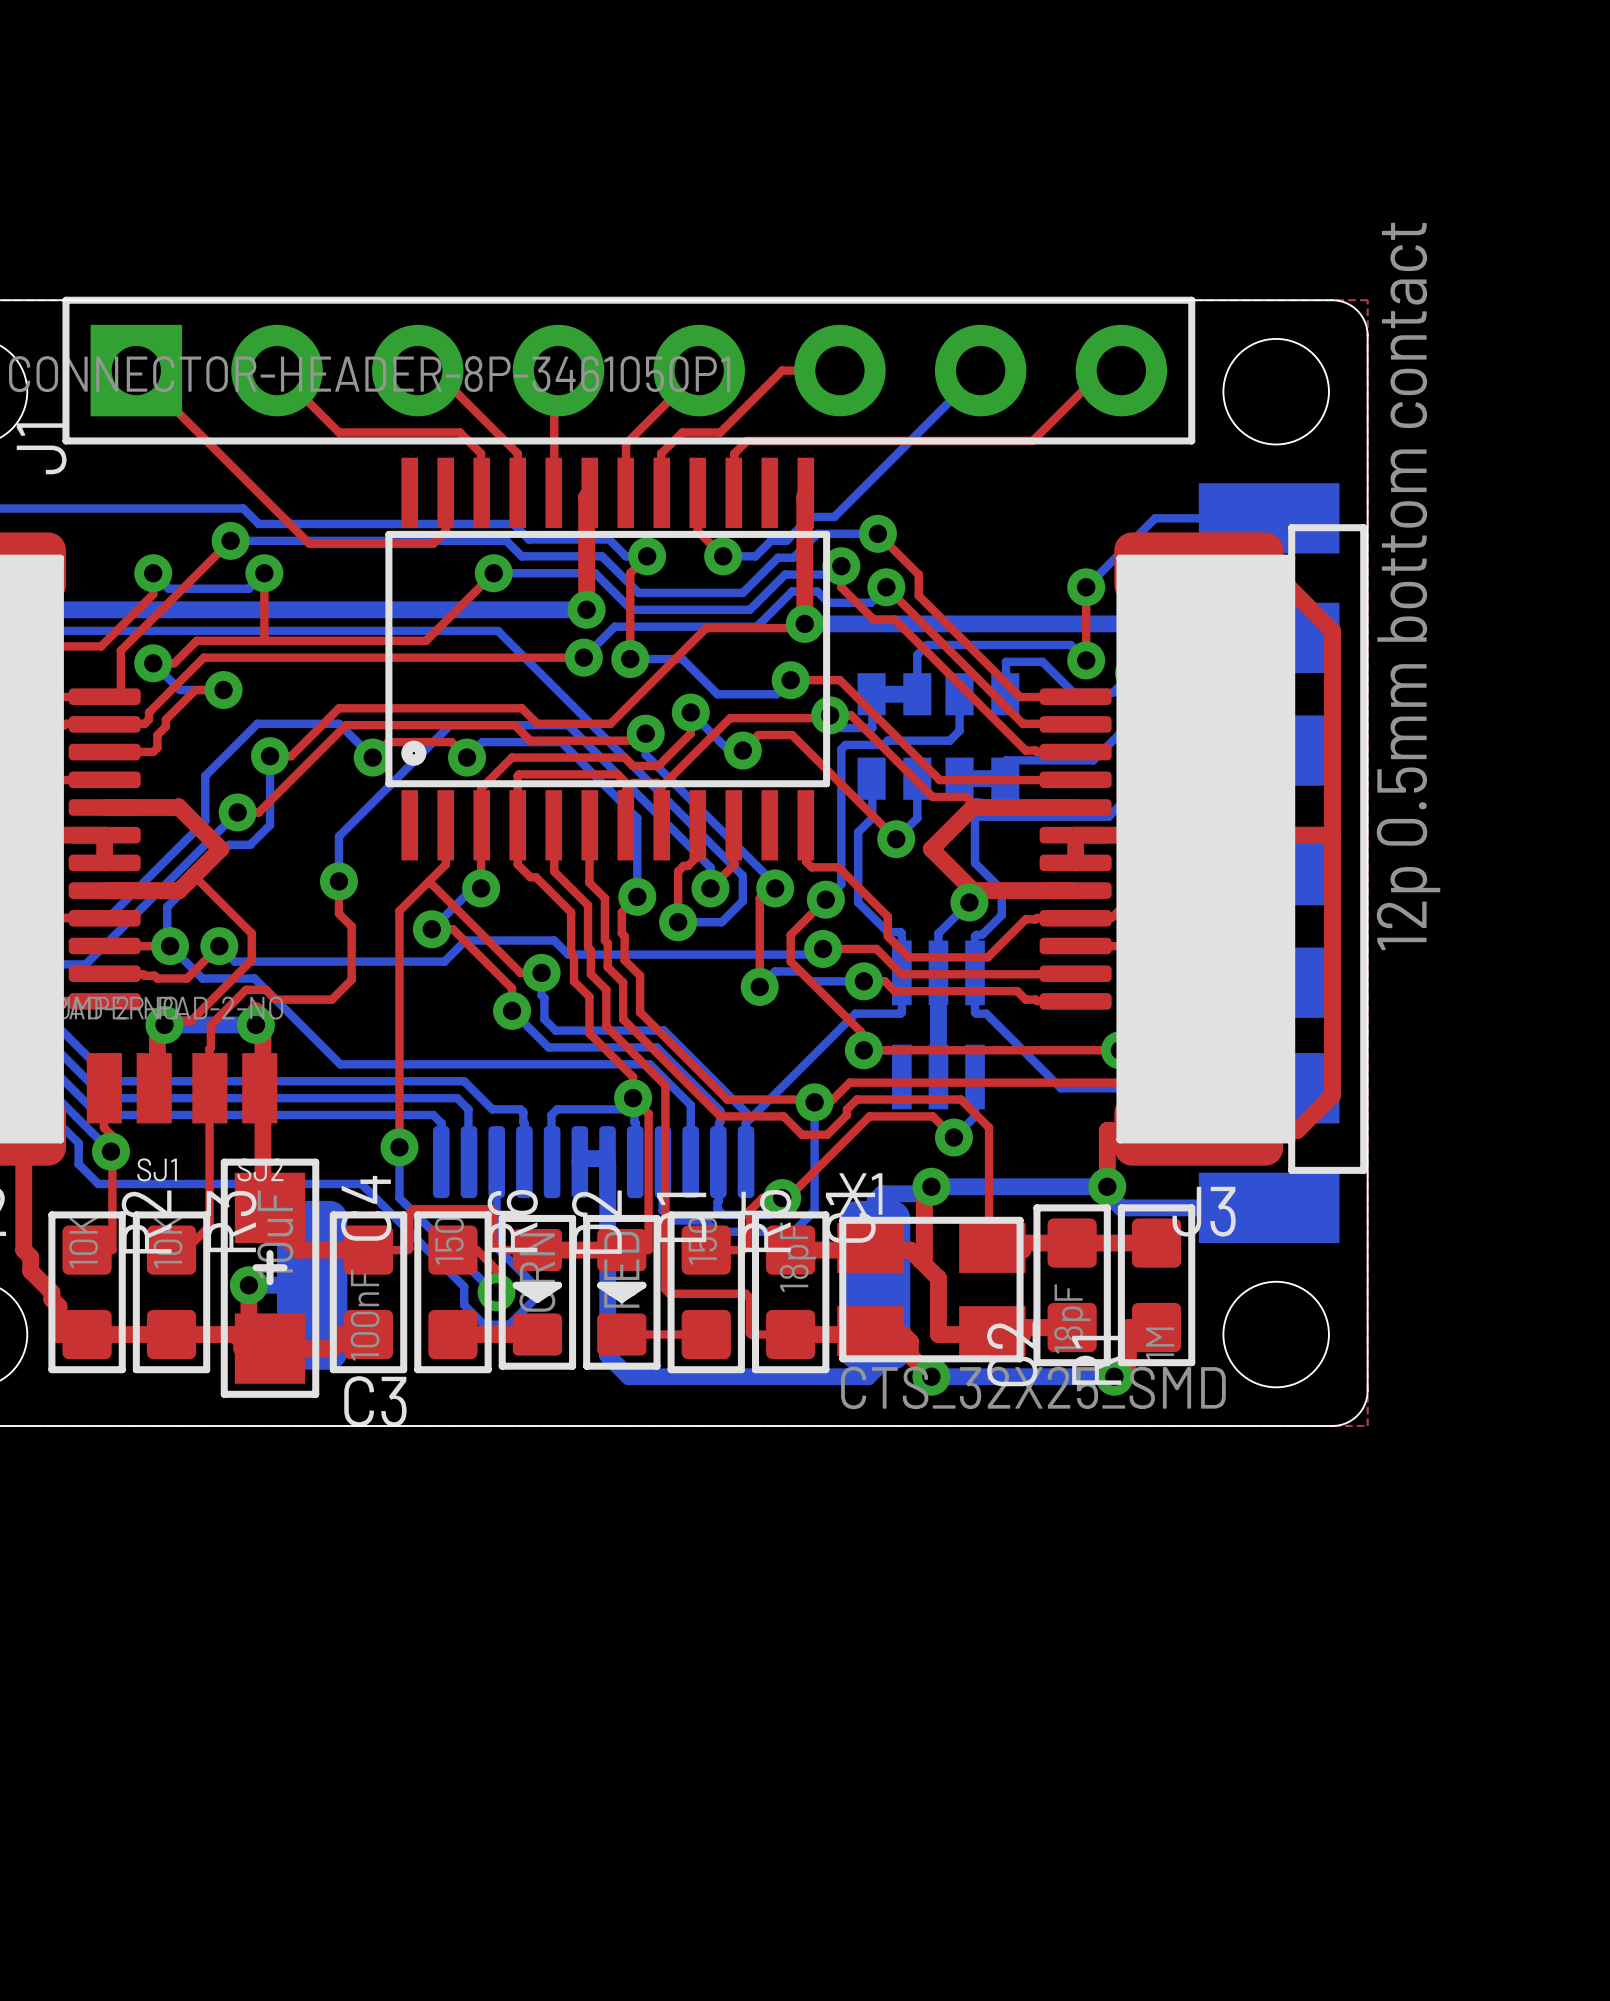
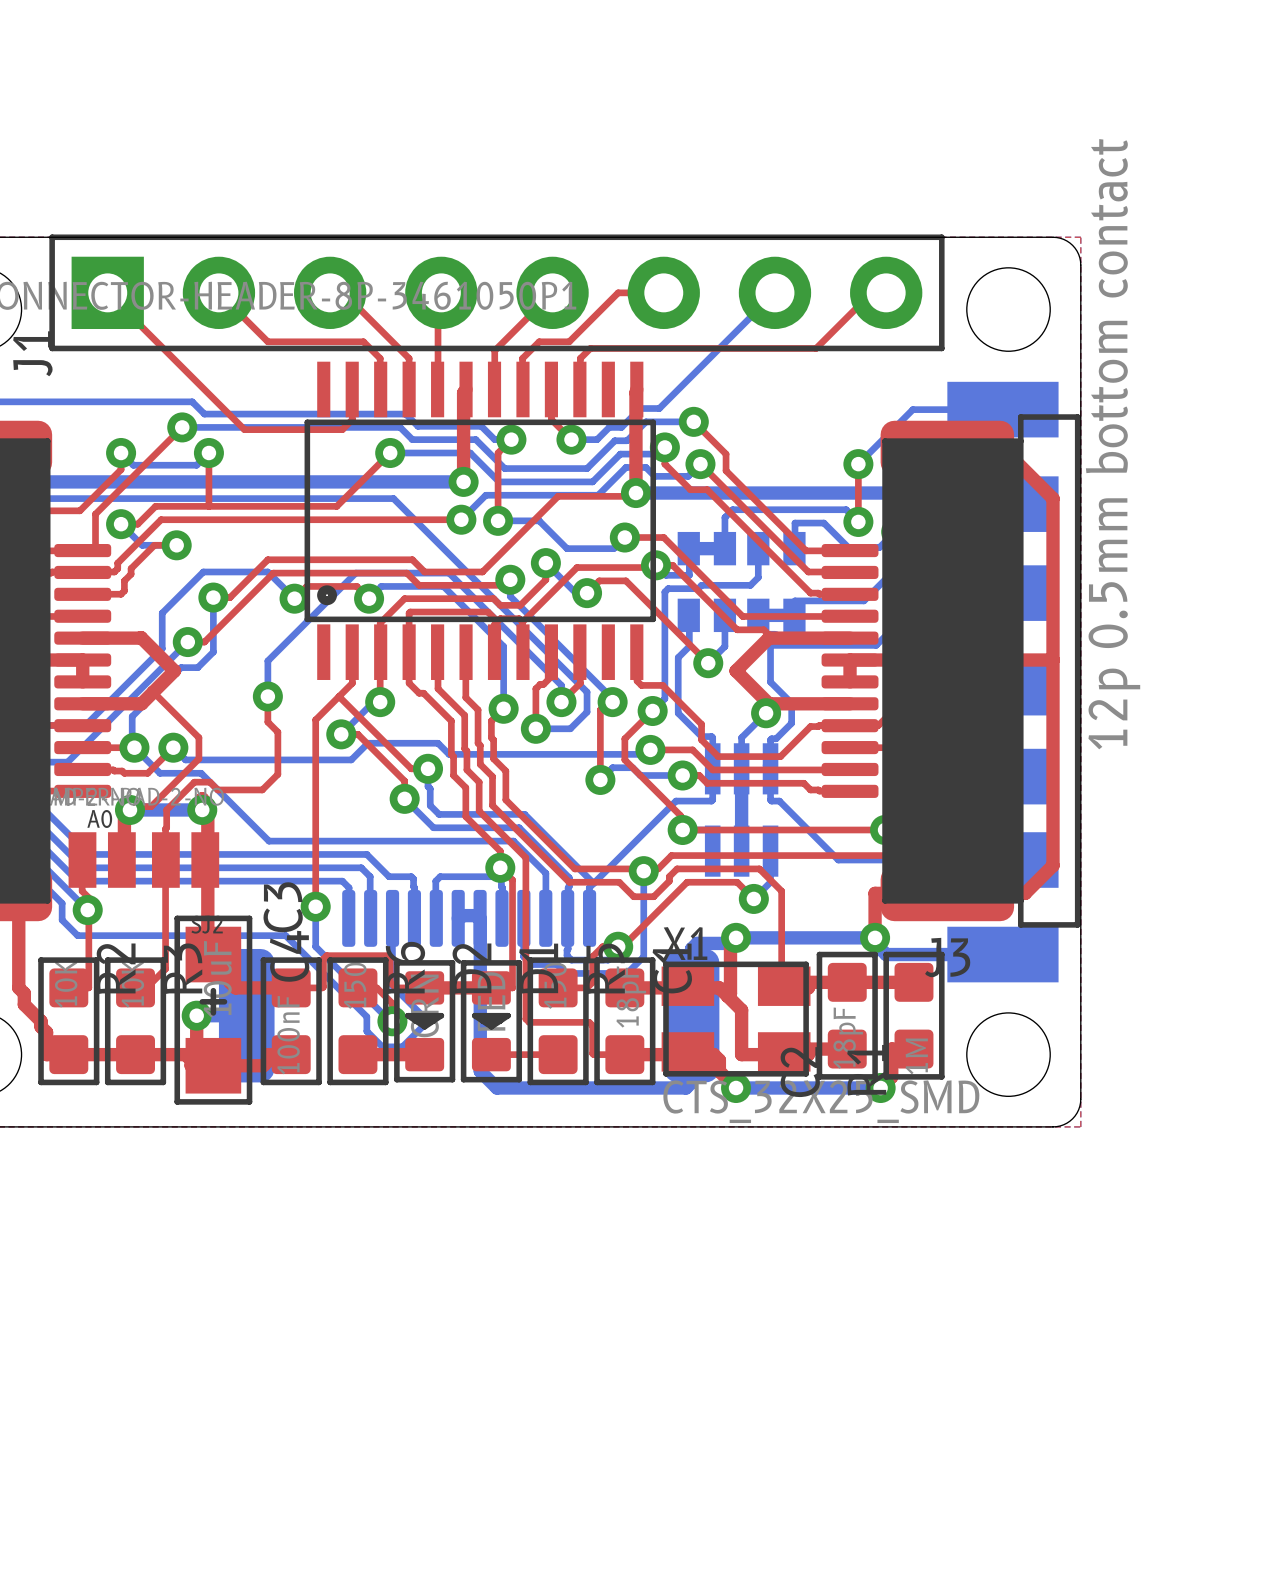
SJ1 name: SJ1 (157, 1169) -> A0 (99, 818)
C3 name rotation: 0° (375, 1401) -> 90° counterclockwise (283, 907)
C3 name position: C3 (375, 1401) -> C3 (283, 907)

